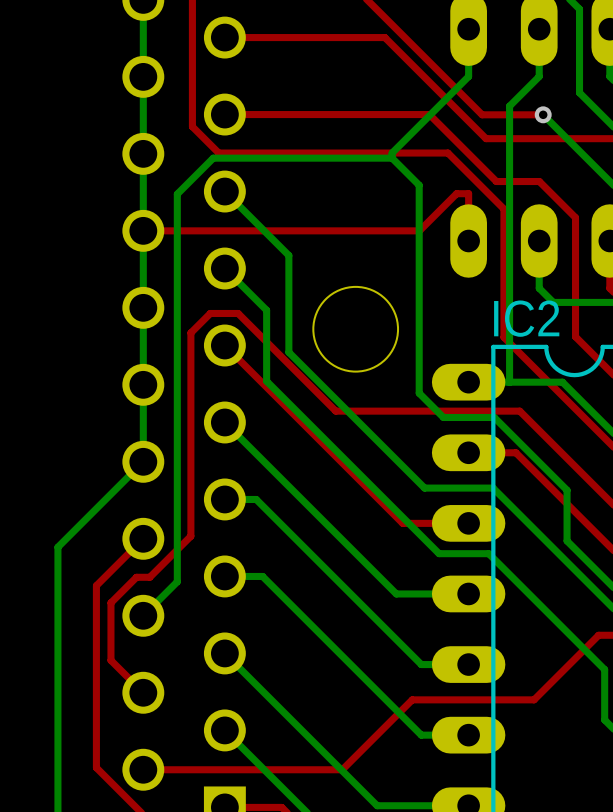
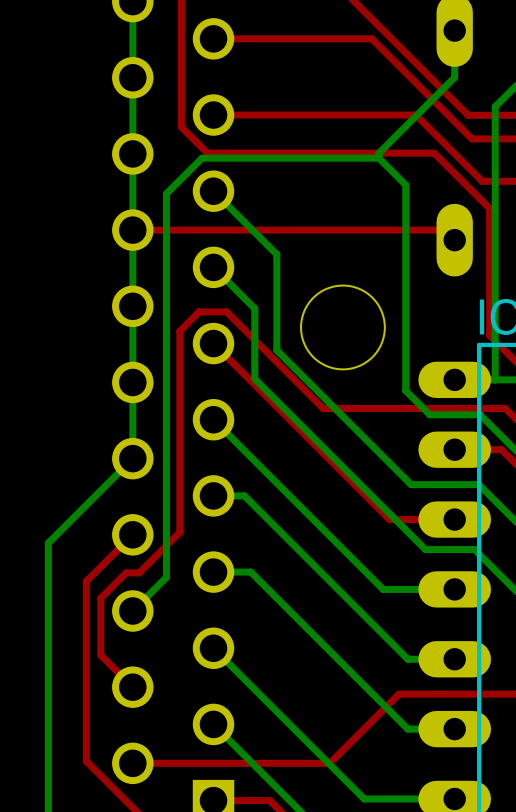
top track: (419, 230) (456, 193) (468, 193) (468, 241) -> (406, 230) (444, 230) (454, 240)

